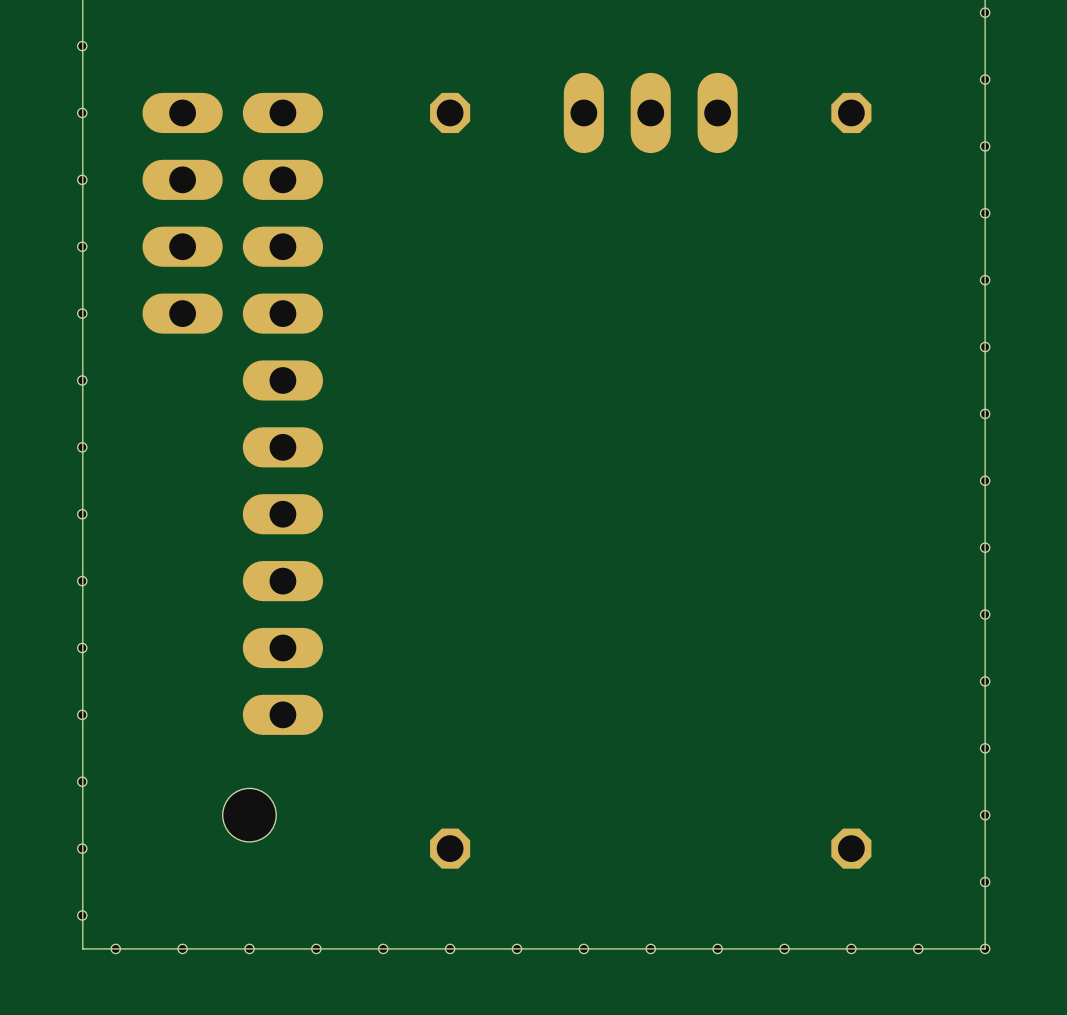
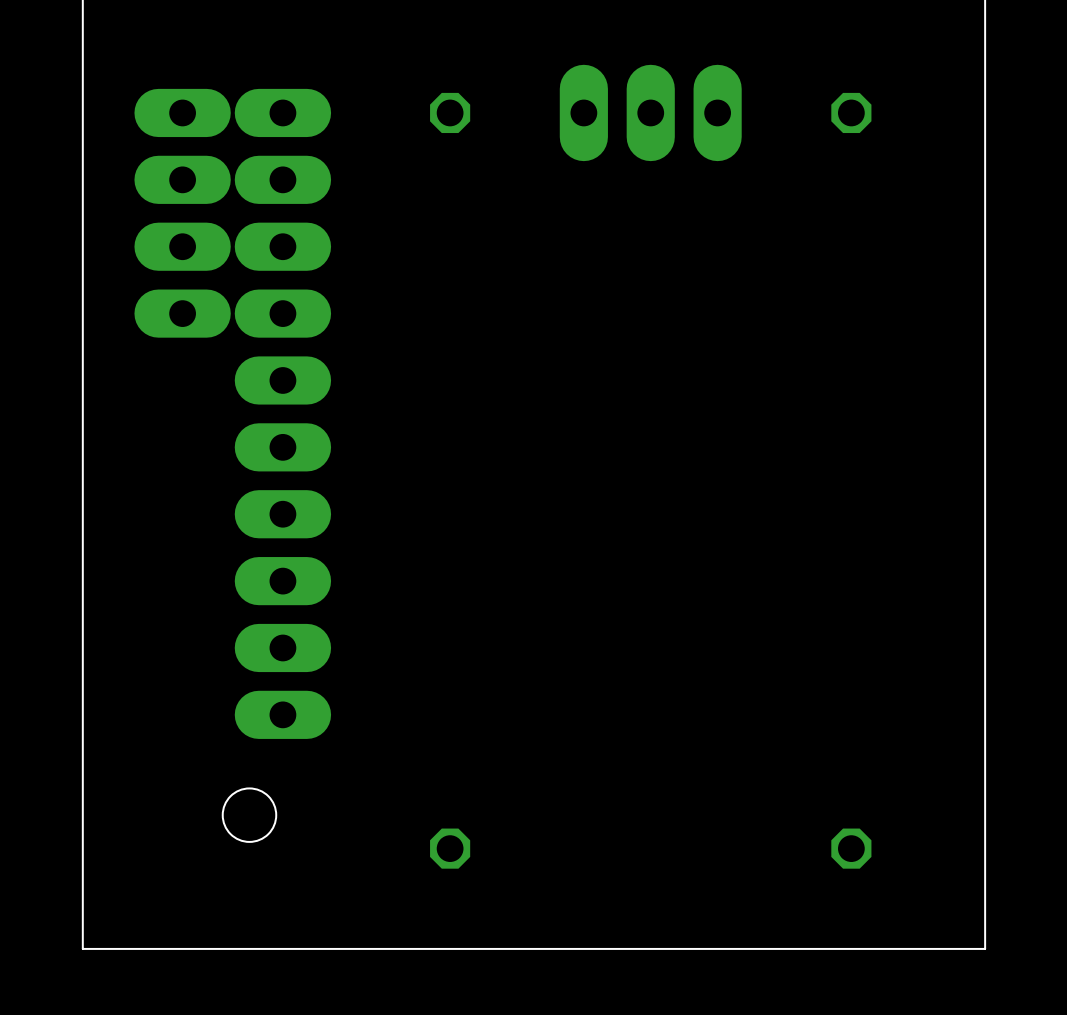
hole: (985, 12) -> none
hole: (82, 46) -> none
part footprint: [563, 72, 738, 154] -> [559, 64, 742, 162]
hole: (985, 79) -> none
part footprint: [142, 92, 223, 334] -> [134, 88, 231, 338]
part footprint: [242, 92, 324, 735] -> [234, 88, 332, 739]
hole: (82, 112) -> none
hole: (985, 146) -> none
hole: (82, 179) -> none
hole: (985, 213) -> none
hole: (82, 246) -> none
hole: (985, 280) -> none
hole: (82, 313) -> none
hole: (985, 347) -> none
hole: (82, 380) -> none
hole: (985, 413) -> none
hole: (82, 447) -> none
hole: (985, 480) -> none
hole: (82, 514) -> none
hole: (985, 547) -> none
hole: (82, 581) -> none
hole: (985, 614) -> none
hole: (82, 647) -> none
hole: (985, 681) -> none
hole: (82, 714) -> none
hole: (985, 748) -> none
hole: (82, 781) -> none
hole: (985, 815) -> none
hole: (82, 848) -> none
hole: (985, 882) -> none
hole: (82, 915) -> none
hole: (115, 948) -> none
hole: (182, 948) -> none
hole: (249, 948) -> none
hole: (316, 948) -> none
hole: (383, 948) -> none
hole: (450, 948) -> none
hole: (516, 948) -> none
hole: (583, 948) -> none
hole: (650, 948) -> none
hole: (717, 948) -> none
hole: (784, 948) -> none
hole: (851, 948) -> none
hole: (918, 948) -> none
hole: (985, 948) -> none

